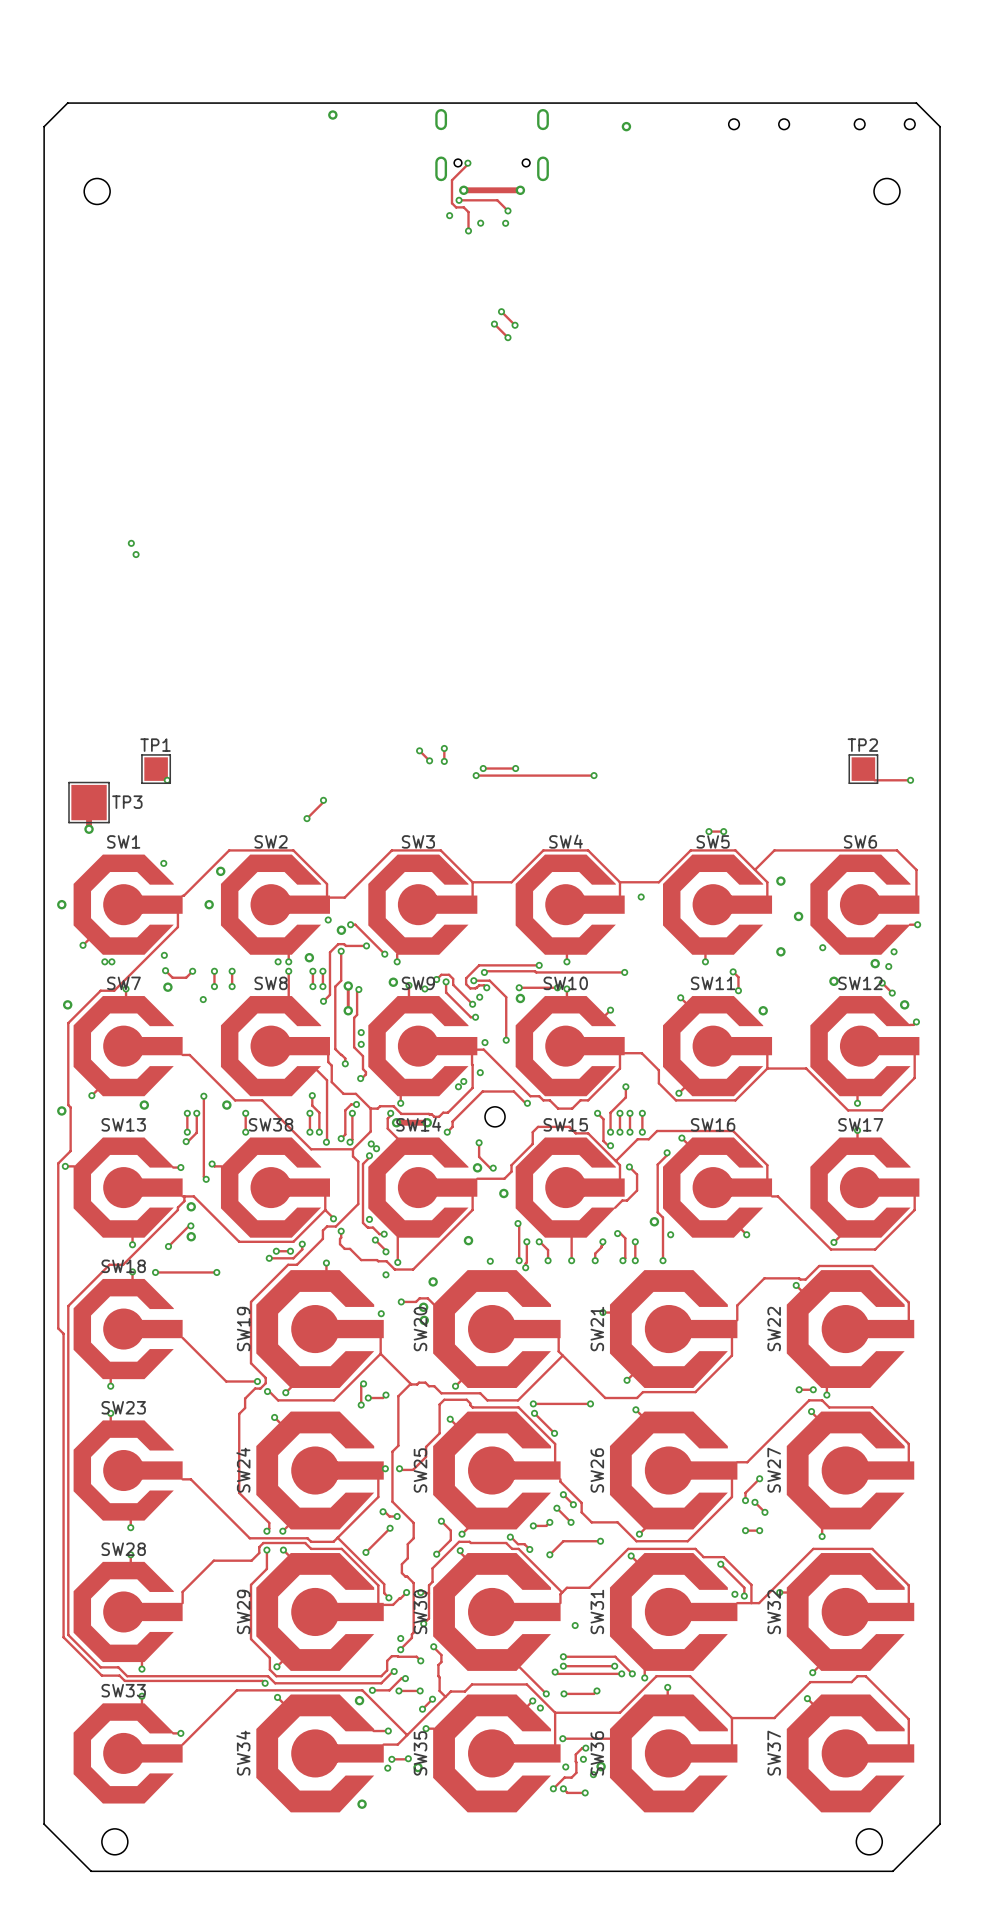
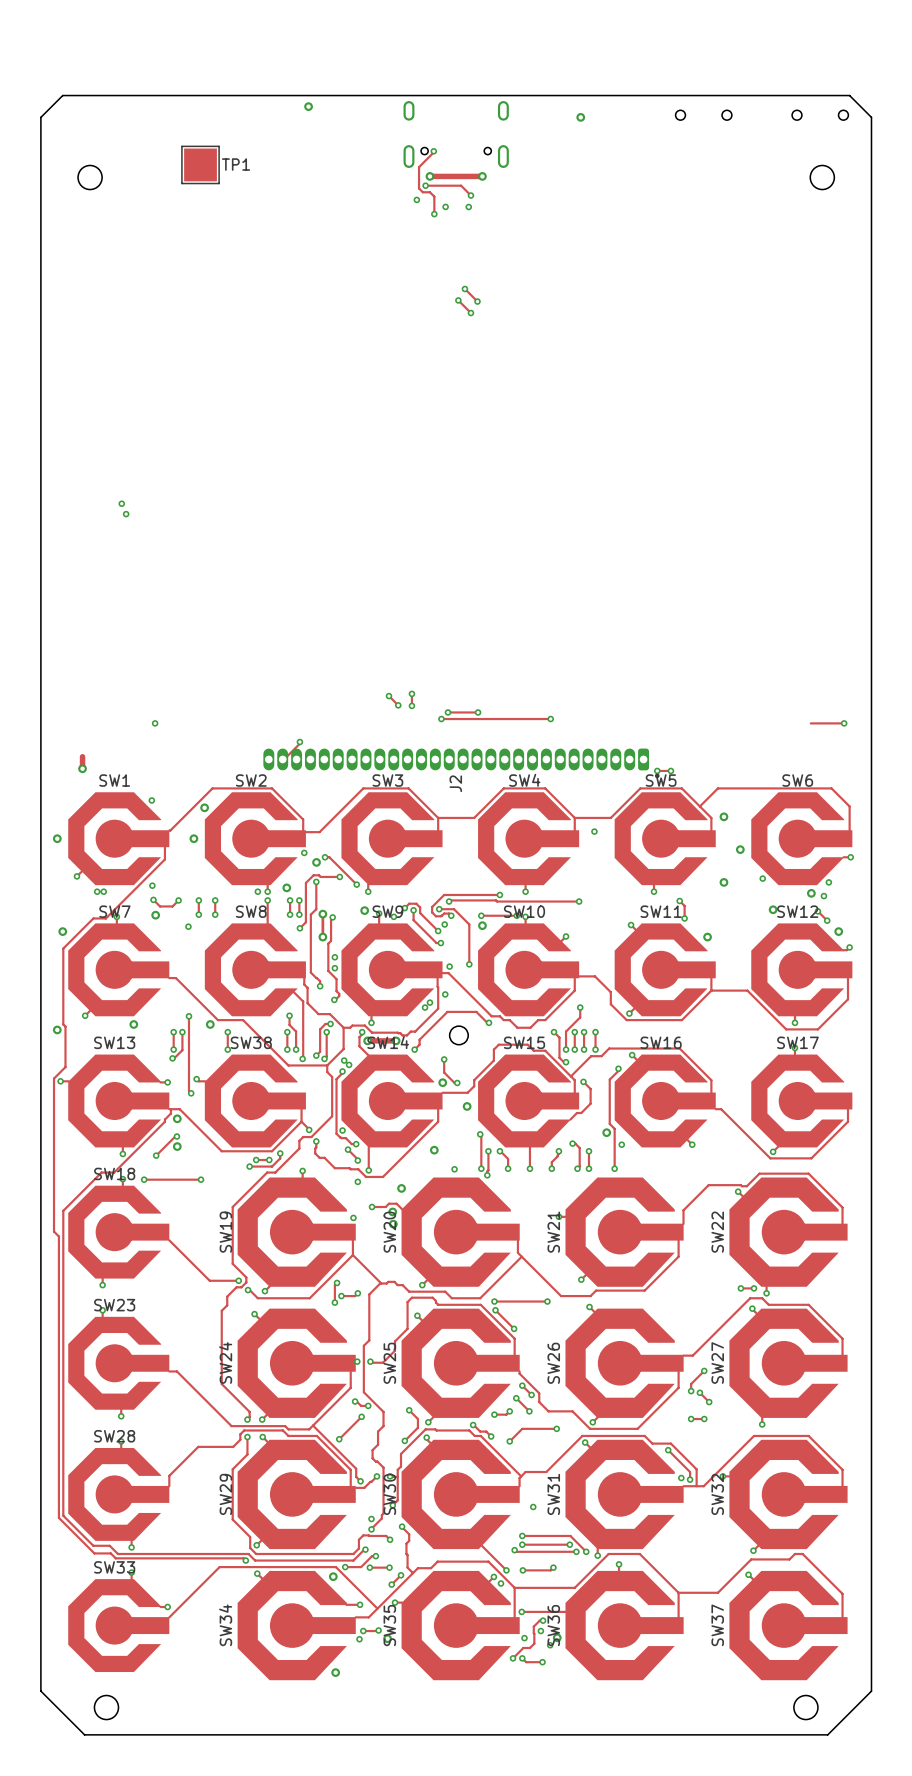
TP1 name position: TP1 (155, 745) -> TP1 (236, 164)
TP1 footprint: [141, 754, 171, 784] -> [181, 145, 220, 185]
TP2: (863, 769) -> none
TP3: (89, 802) -> none
J2: none -> (461, 763)

